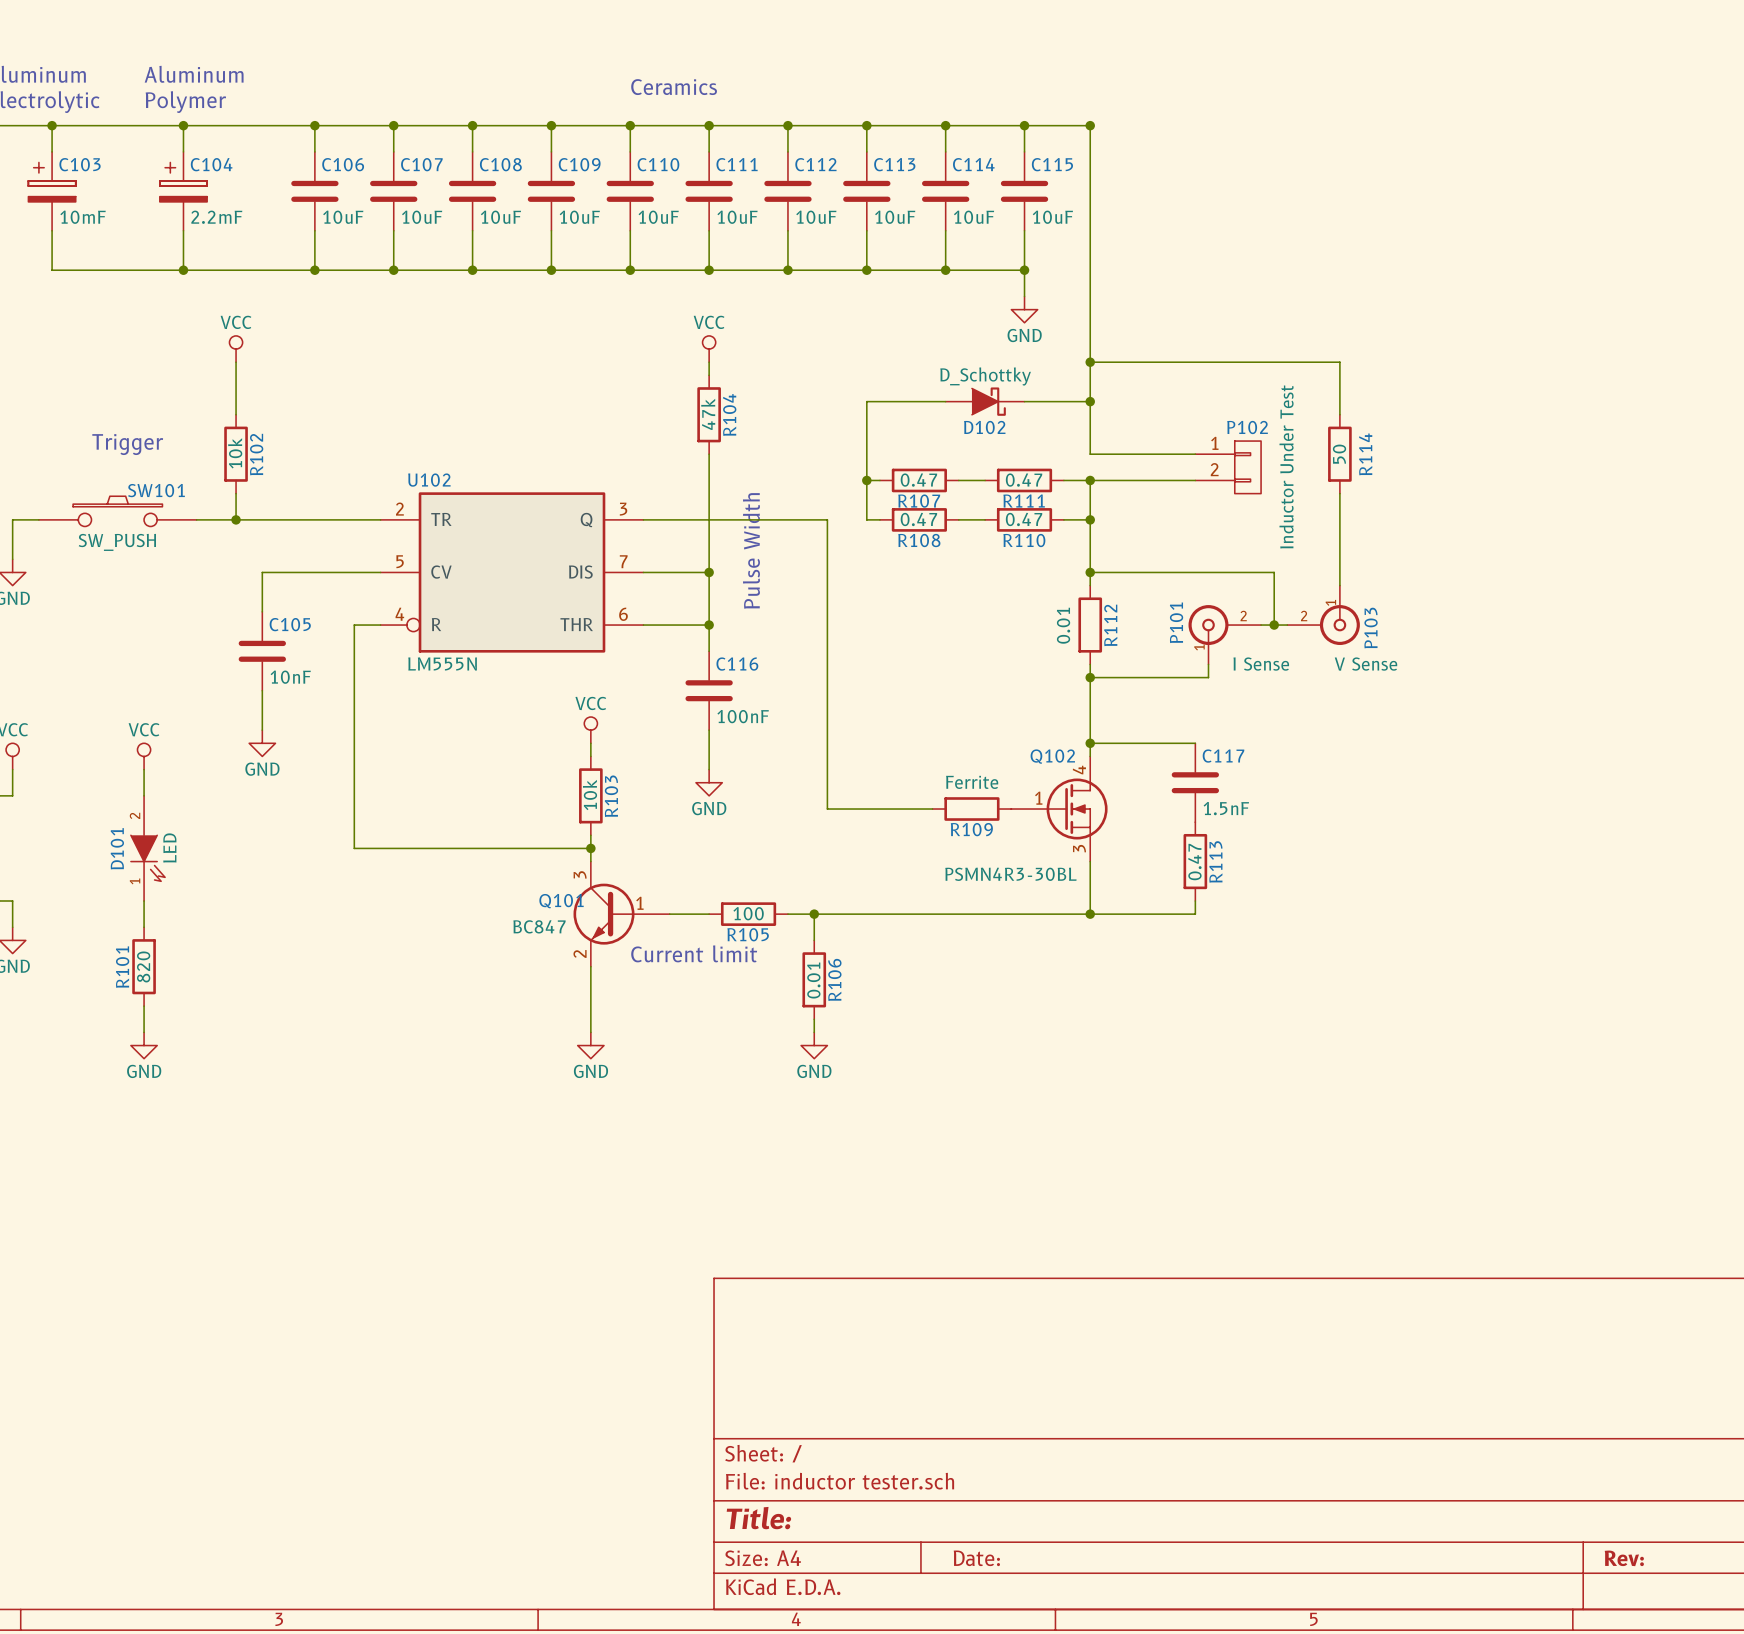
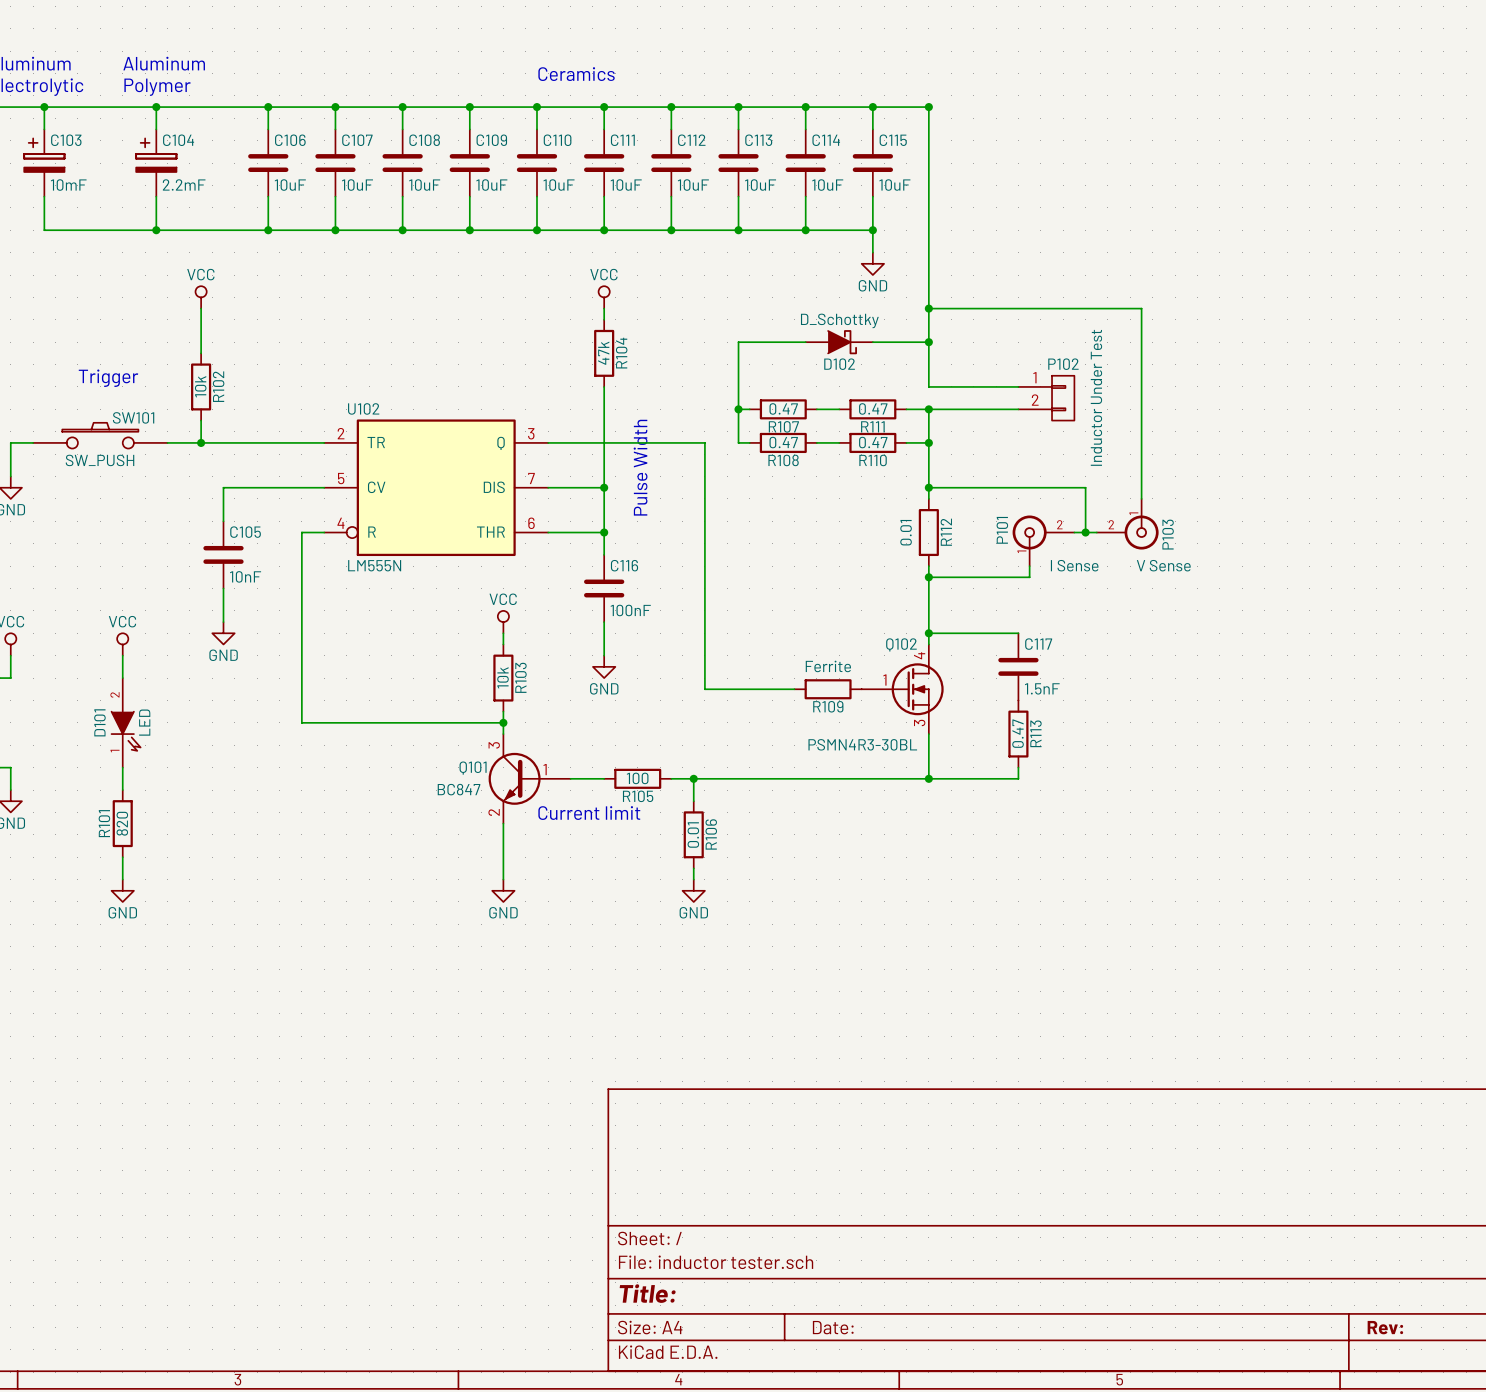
wire: none -> (1141, 353) (1141, 420)
R114: 50 (1339, 454) -> none

